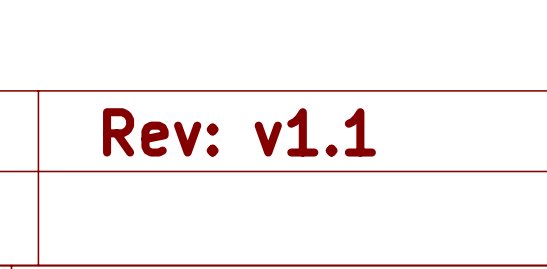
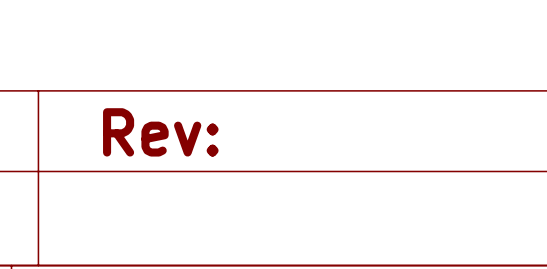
title block: Rev: v1.1 (239, 132) -> Rev: (160, 132)

